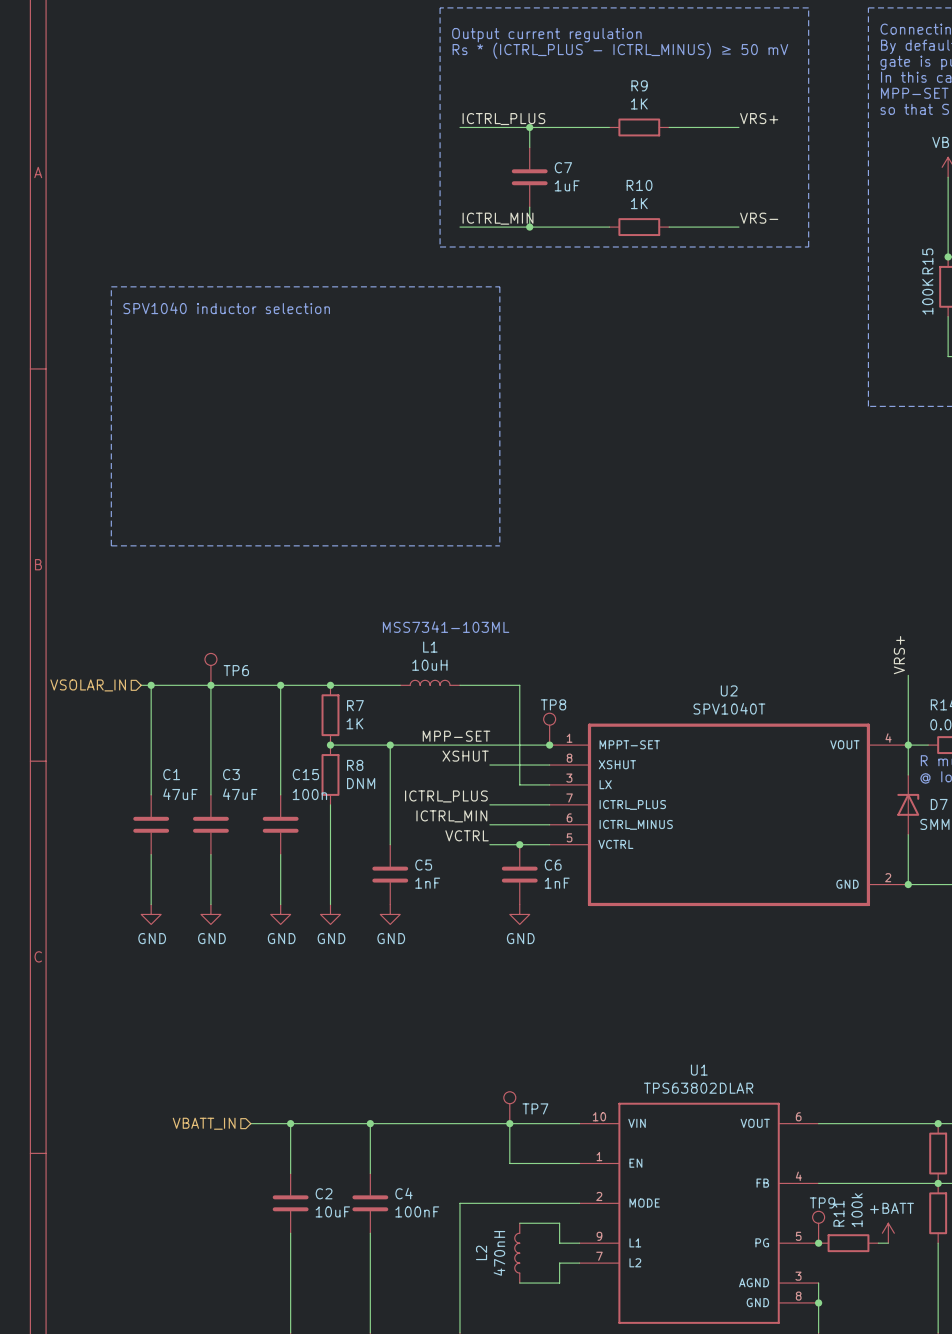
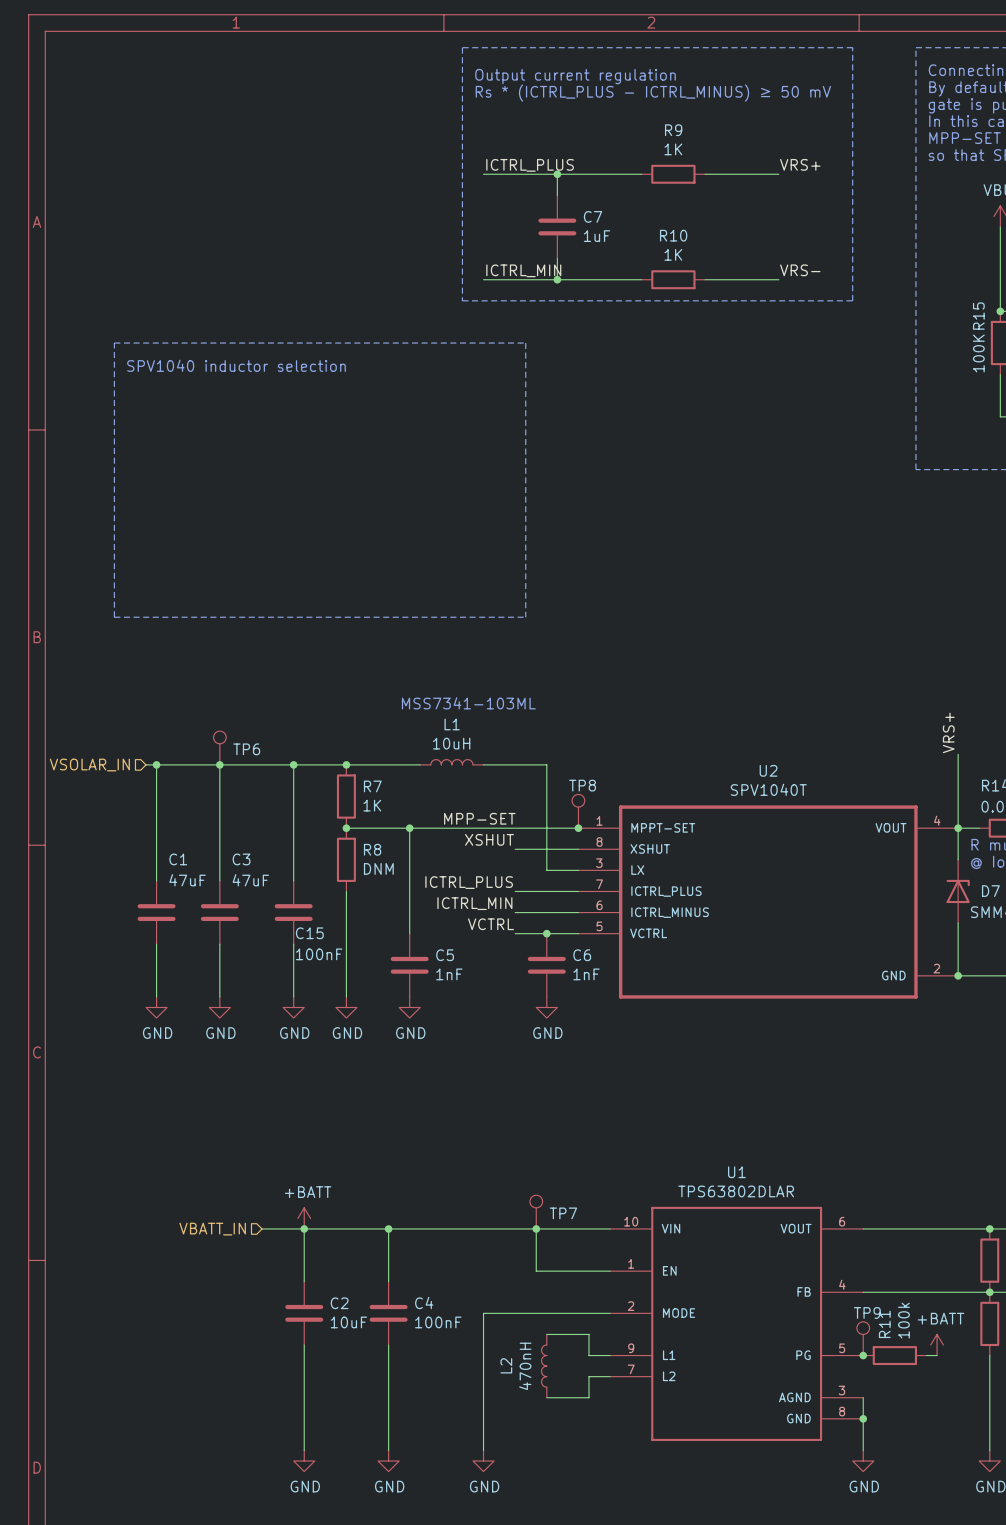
C15 name position: C15 (305, 774) -> C15 (309, 933)
C15 value: 100n (309, 794) -> 100nF (319, 954)
power symbol: none -> +BATT (304, 1218)

